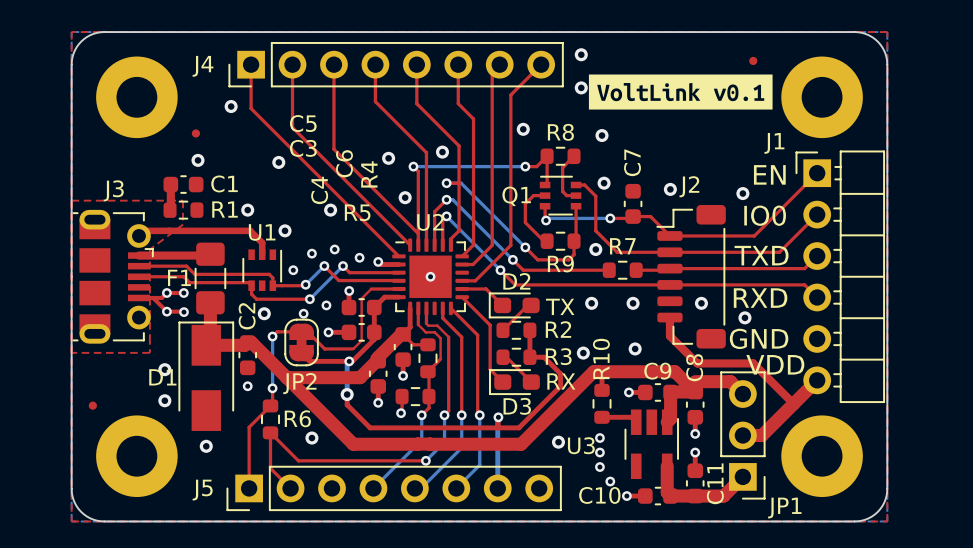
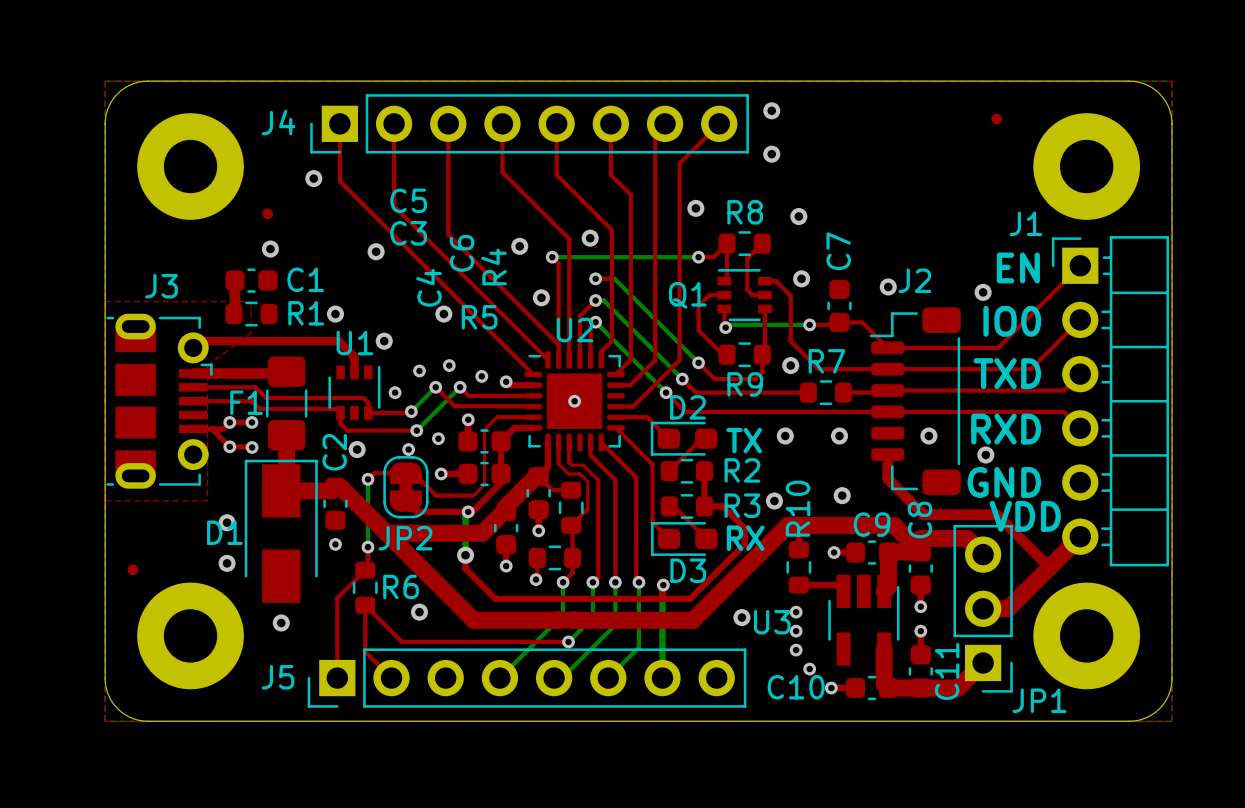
drawing: [588, 74, 773, 110] -> none

